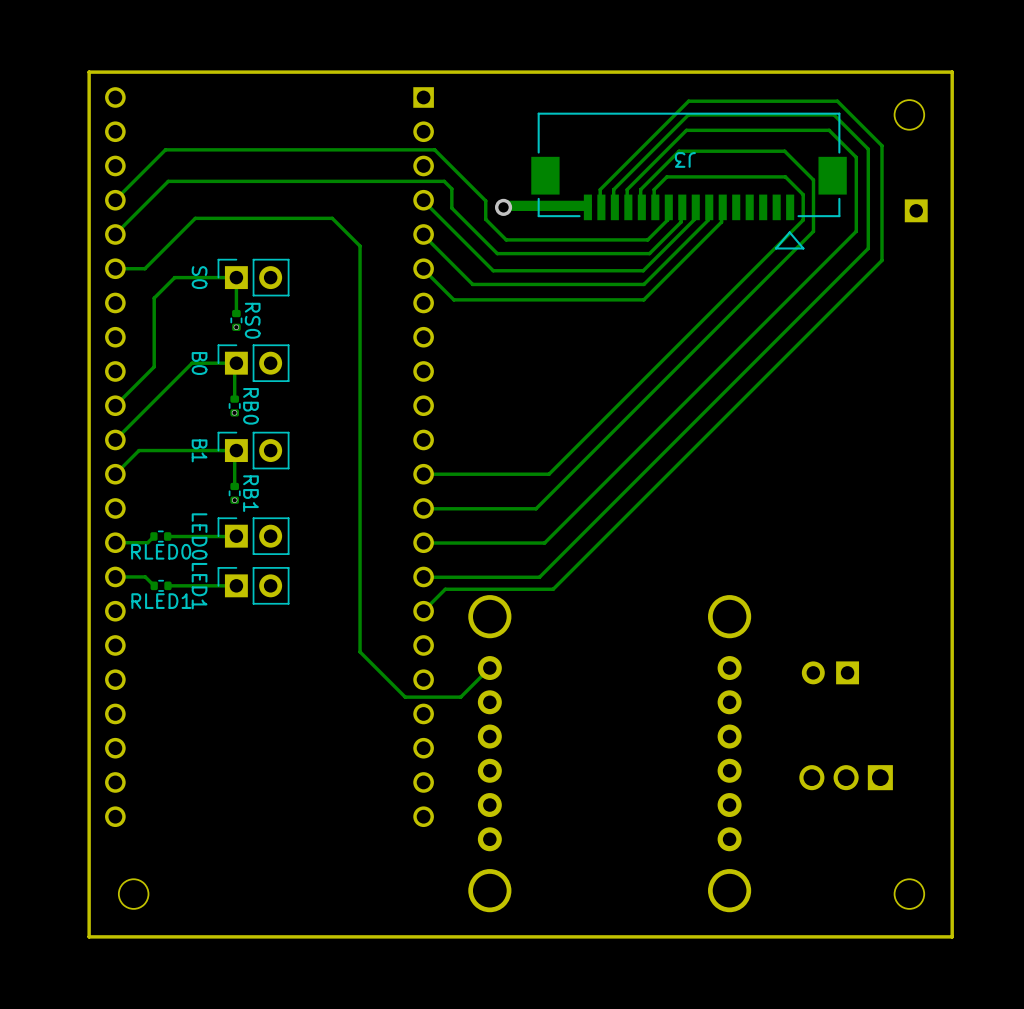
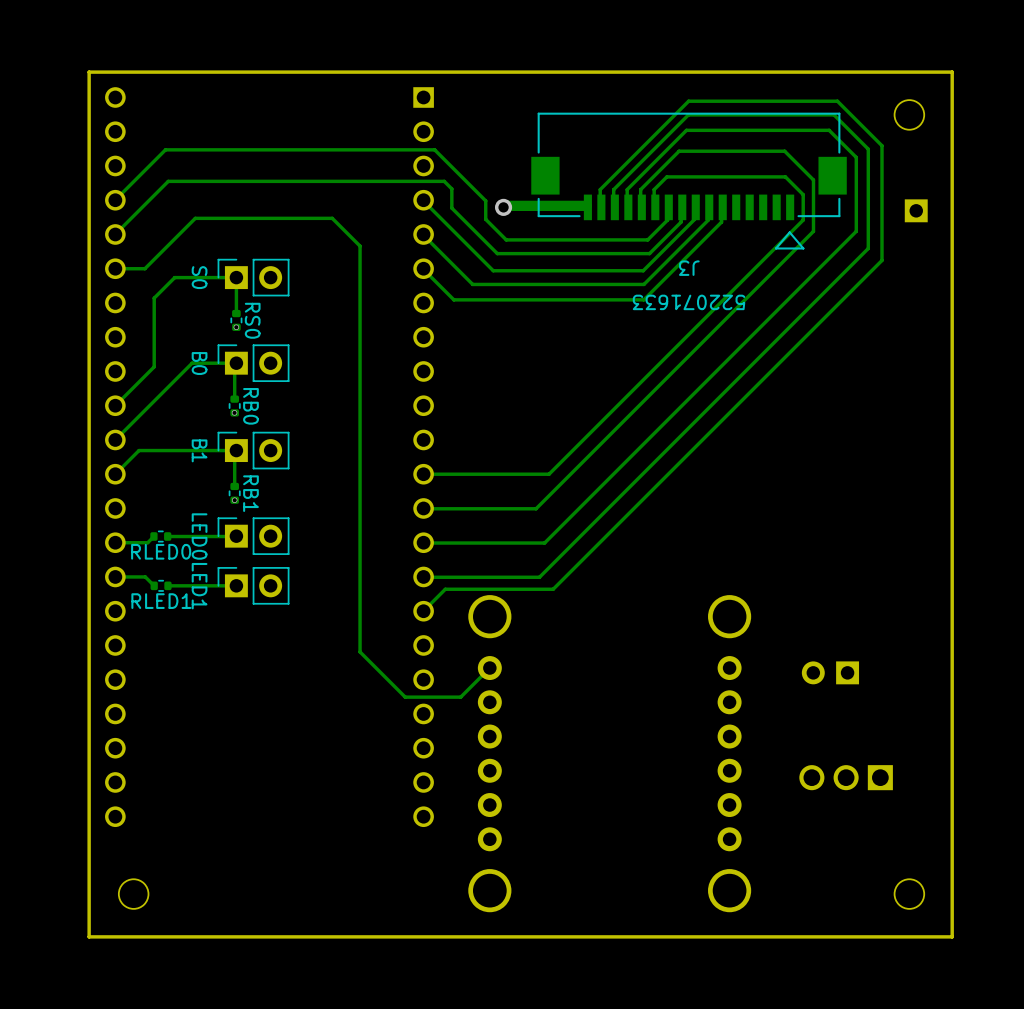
J3 name position: J3 (685, 159) -> J3 (689, 268)
J3 text: none -> 522071633 (689, 302)

